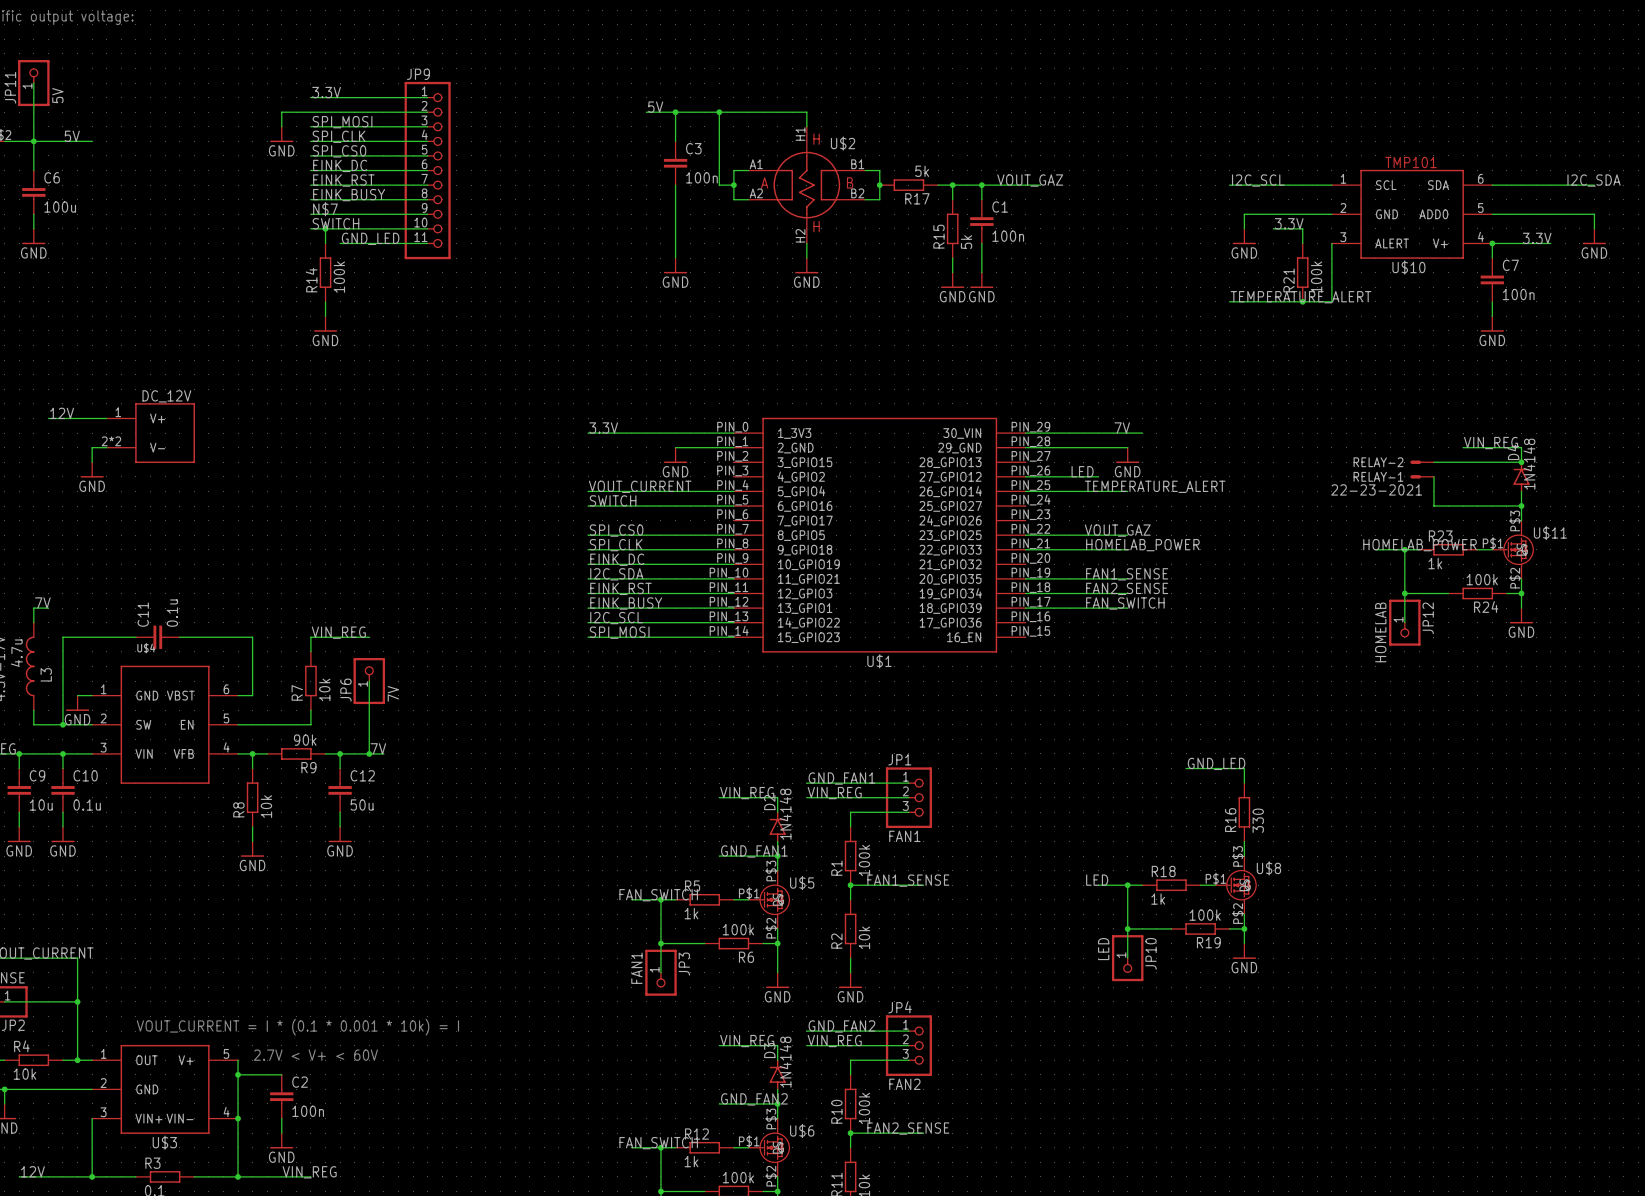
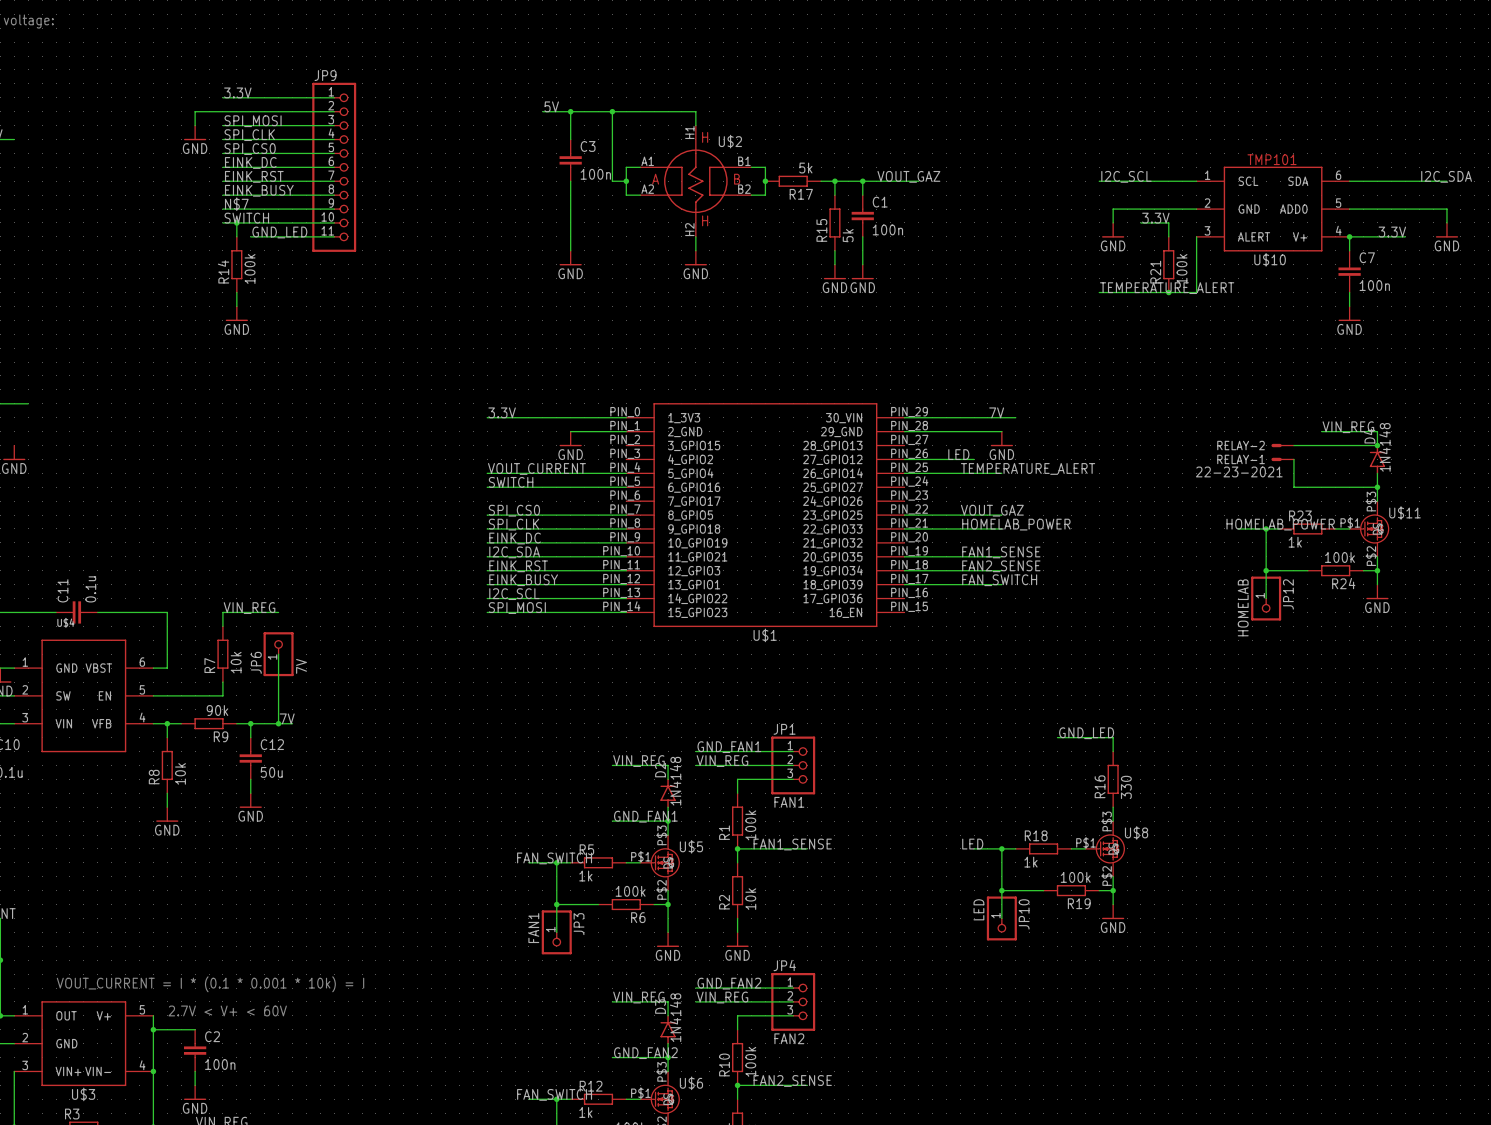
DC_12V: (150, 433) -> none
wire: (106, 447) (92, 447) (92, 462) -> none

